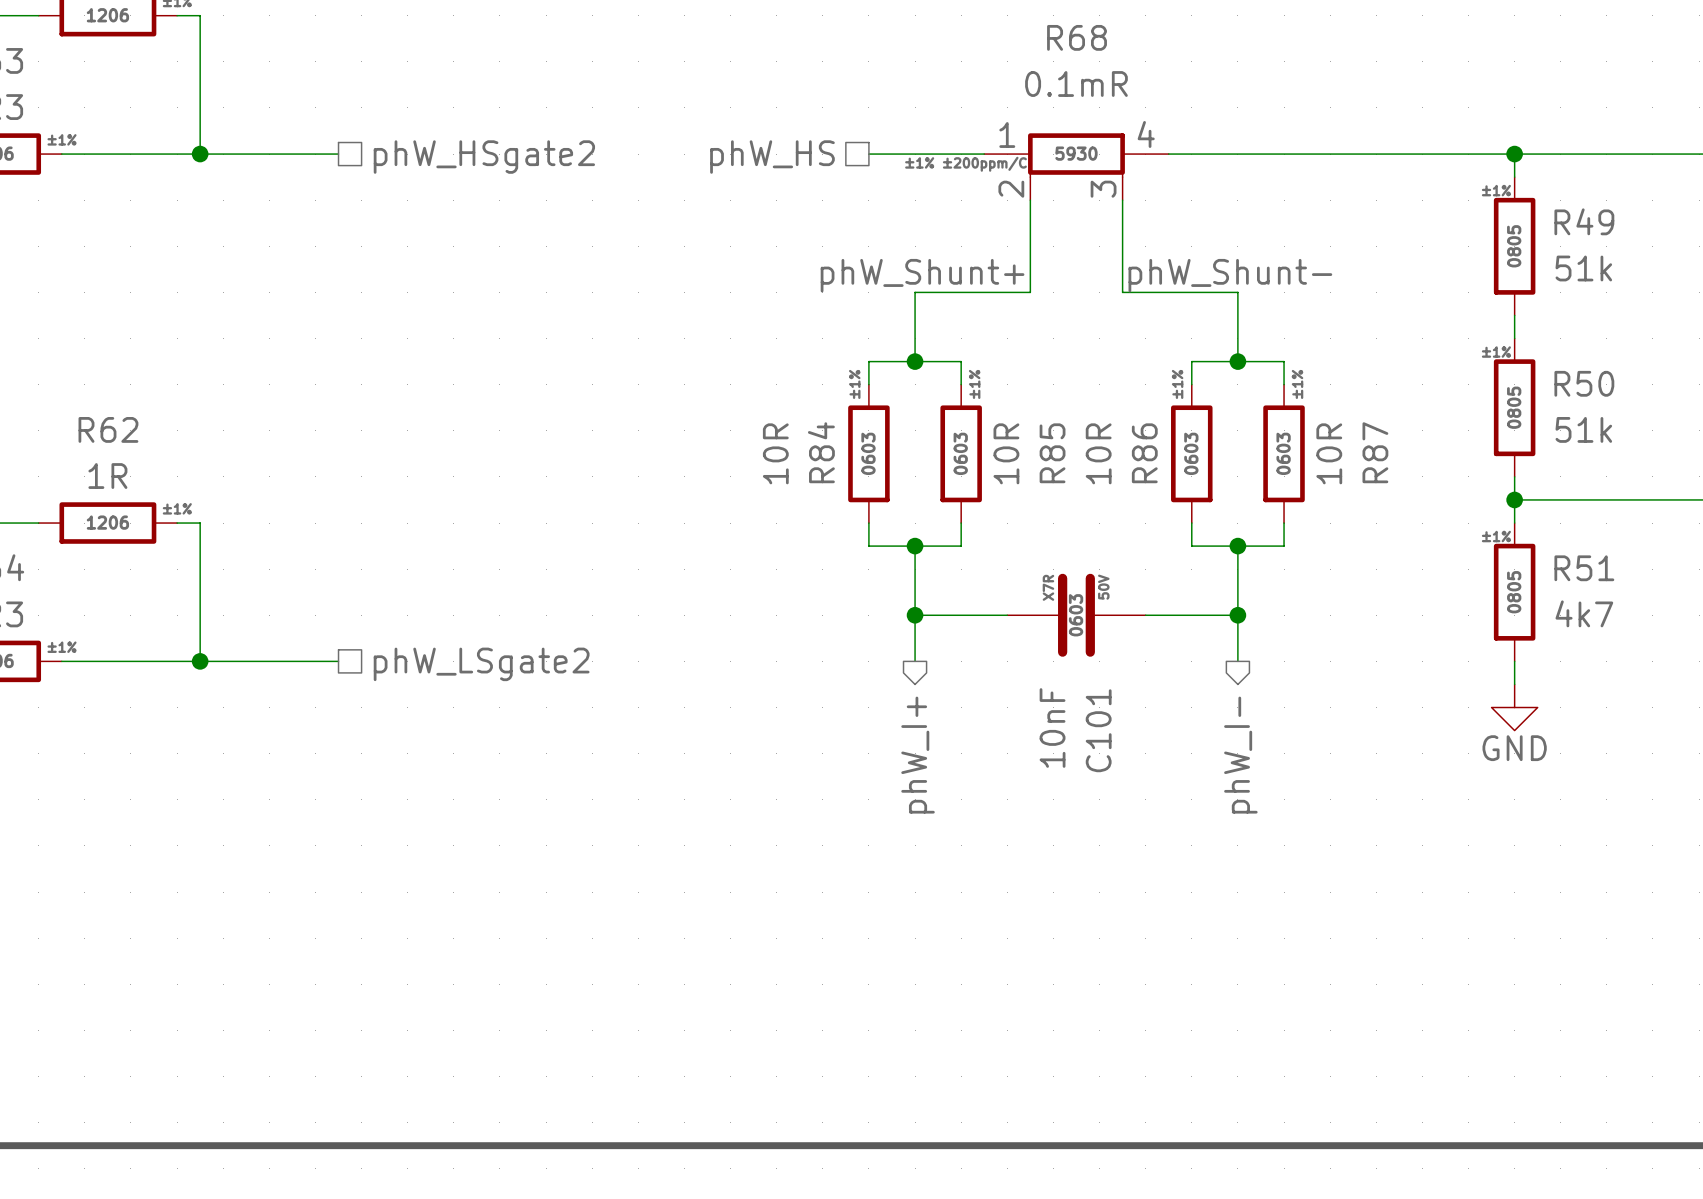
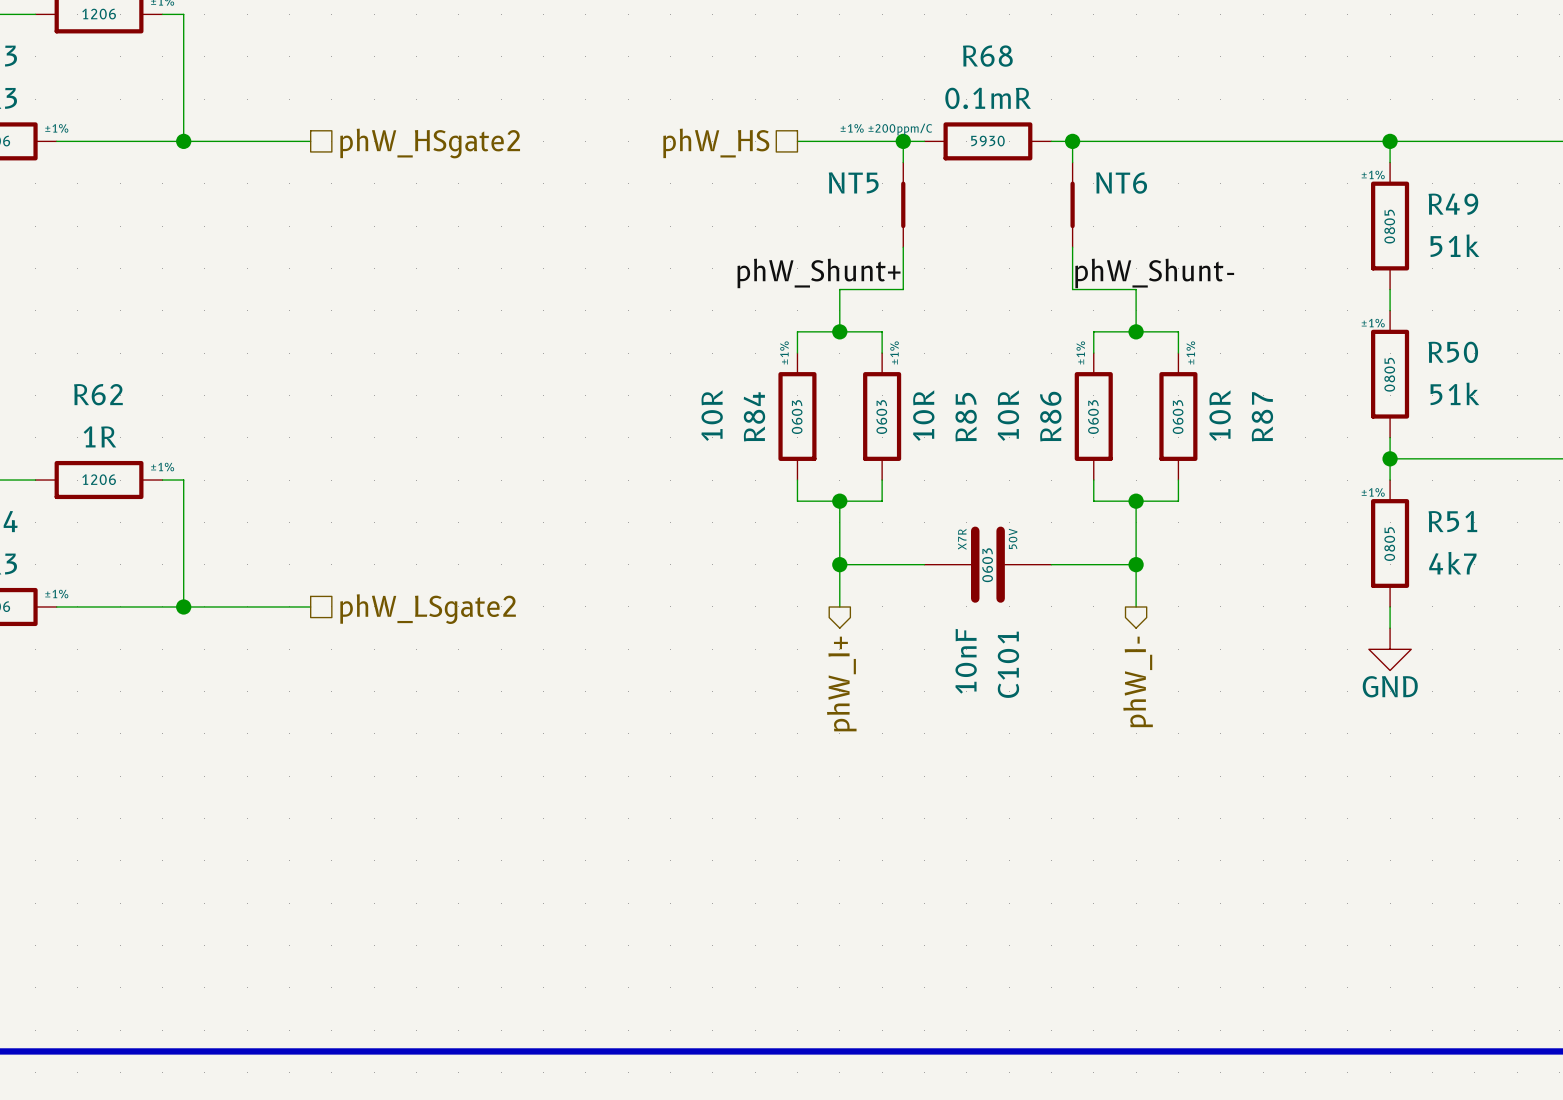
R68 symbol: [984, 133, 1169, 201] -> [924, 122, 1052, 161]
junction: none -> (903, 141)
wire: none -> (924, 141) (903, 141) (903, 162)
wire: none -> (1051, 141) (1072, 141) (1072, 162)
junction: none -> (1072, 141)
wire: (1030, 200) (1030, 292) (915, 292) (915, 315) -> (903, 247) (903, 289) (839, 289)
wire: (1122, 200) (1122, 292) (1237, 292) (1237, 315) -> (1072, 247) (1072, 289) (1136, 289)
NT5: none -> (903, 204)
NT6: none -> (1072, 204)
label position: phW_Shunt+ (922, 275) -> phW_Shunt+ (819, 273)
label position: phW_Shunt- (1230, 275) -> phW_Shunt- (1154, 273)

